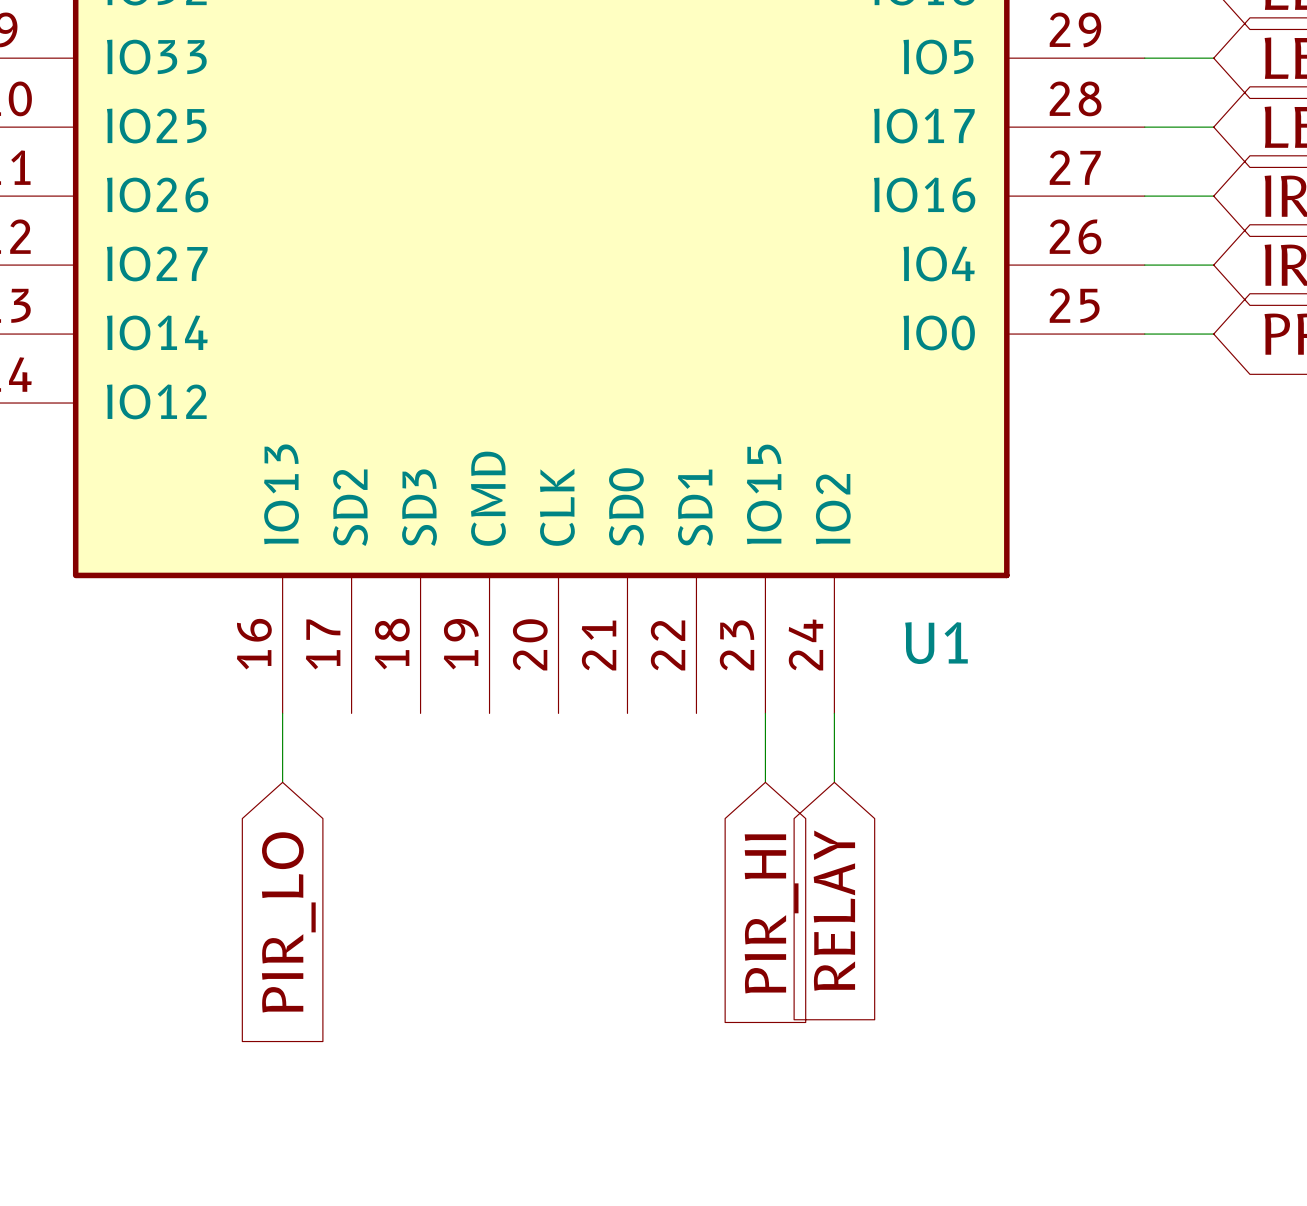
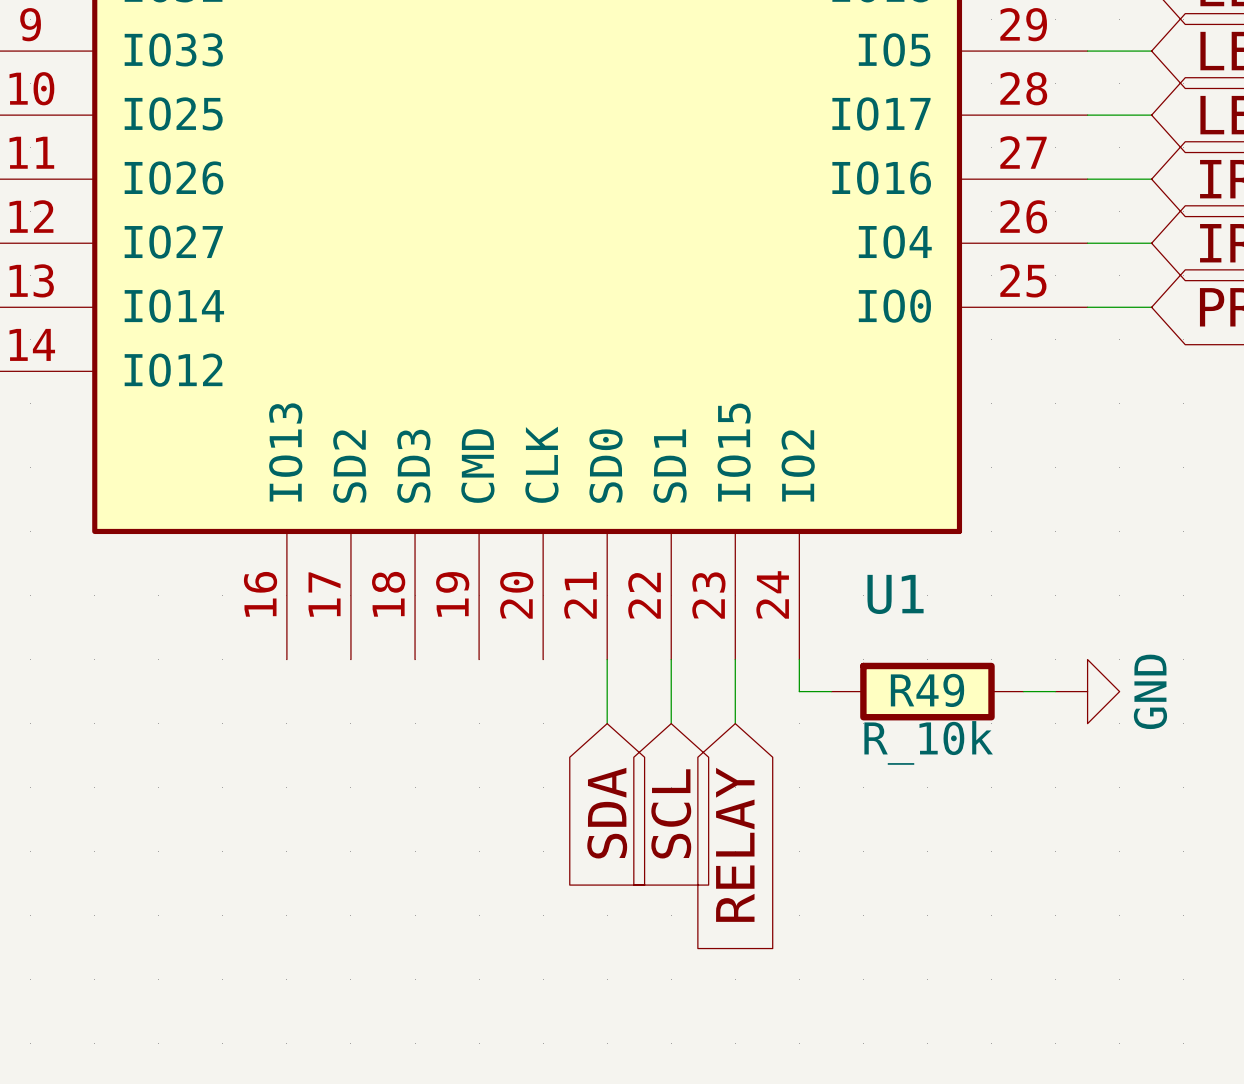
wire: (282, 713) (282, 782) -> (607, 659) (607, 723)
wire: none -> (671, 659) (671, 723)
wire: (834, 747) (834, 782) -> (799, 691) (831, 691)
R49: none -> R_10k (927, 691)
wire: none -> (1023, 691) (1055, 691)
power symbol: none -> GND (1087, 691)
global label: none -> SCL (671, 813)
global label: none -> SDA (607, 813)
global label: RELAY (834, 910) -> none
global label: PIR_HI (771, 913) -> RELAY (735, 844)
global label: PIR_LO (288, 922) -> none

